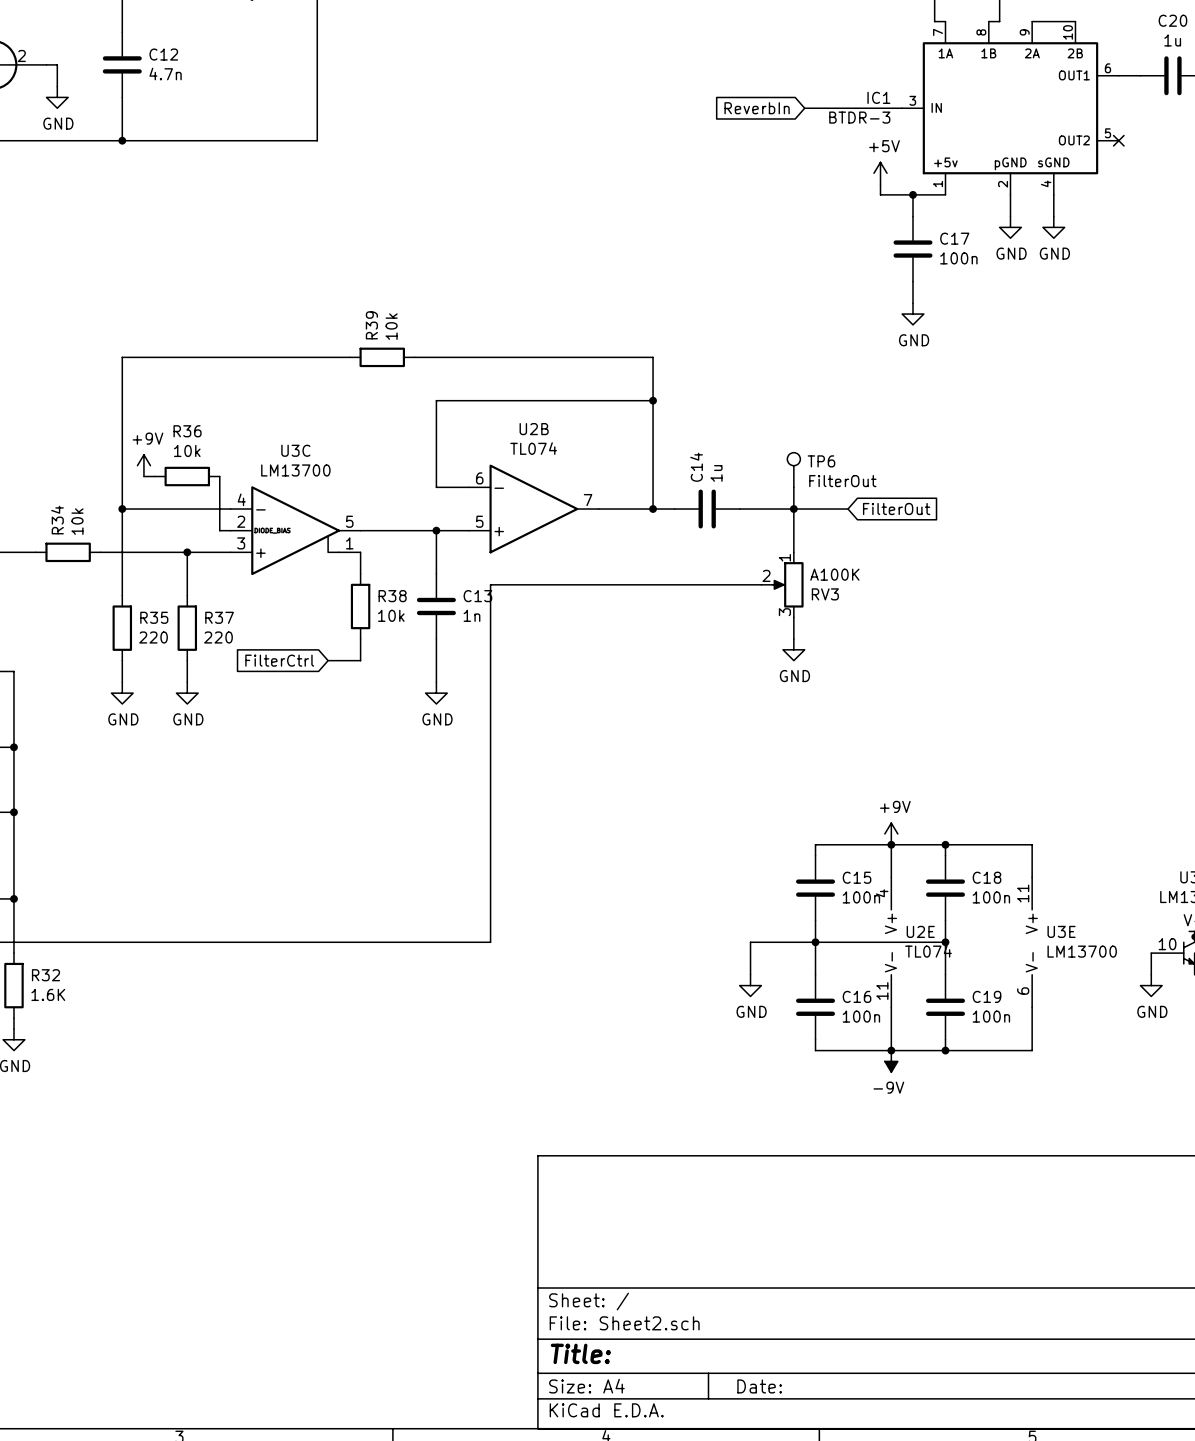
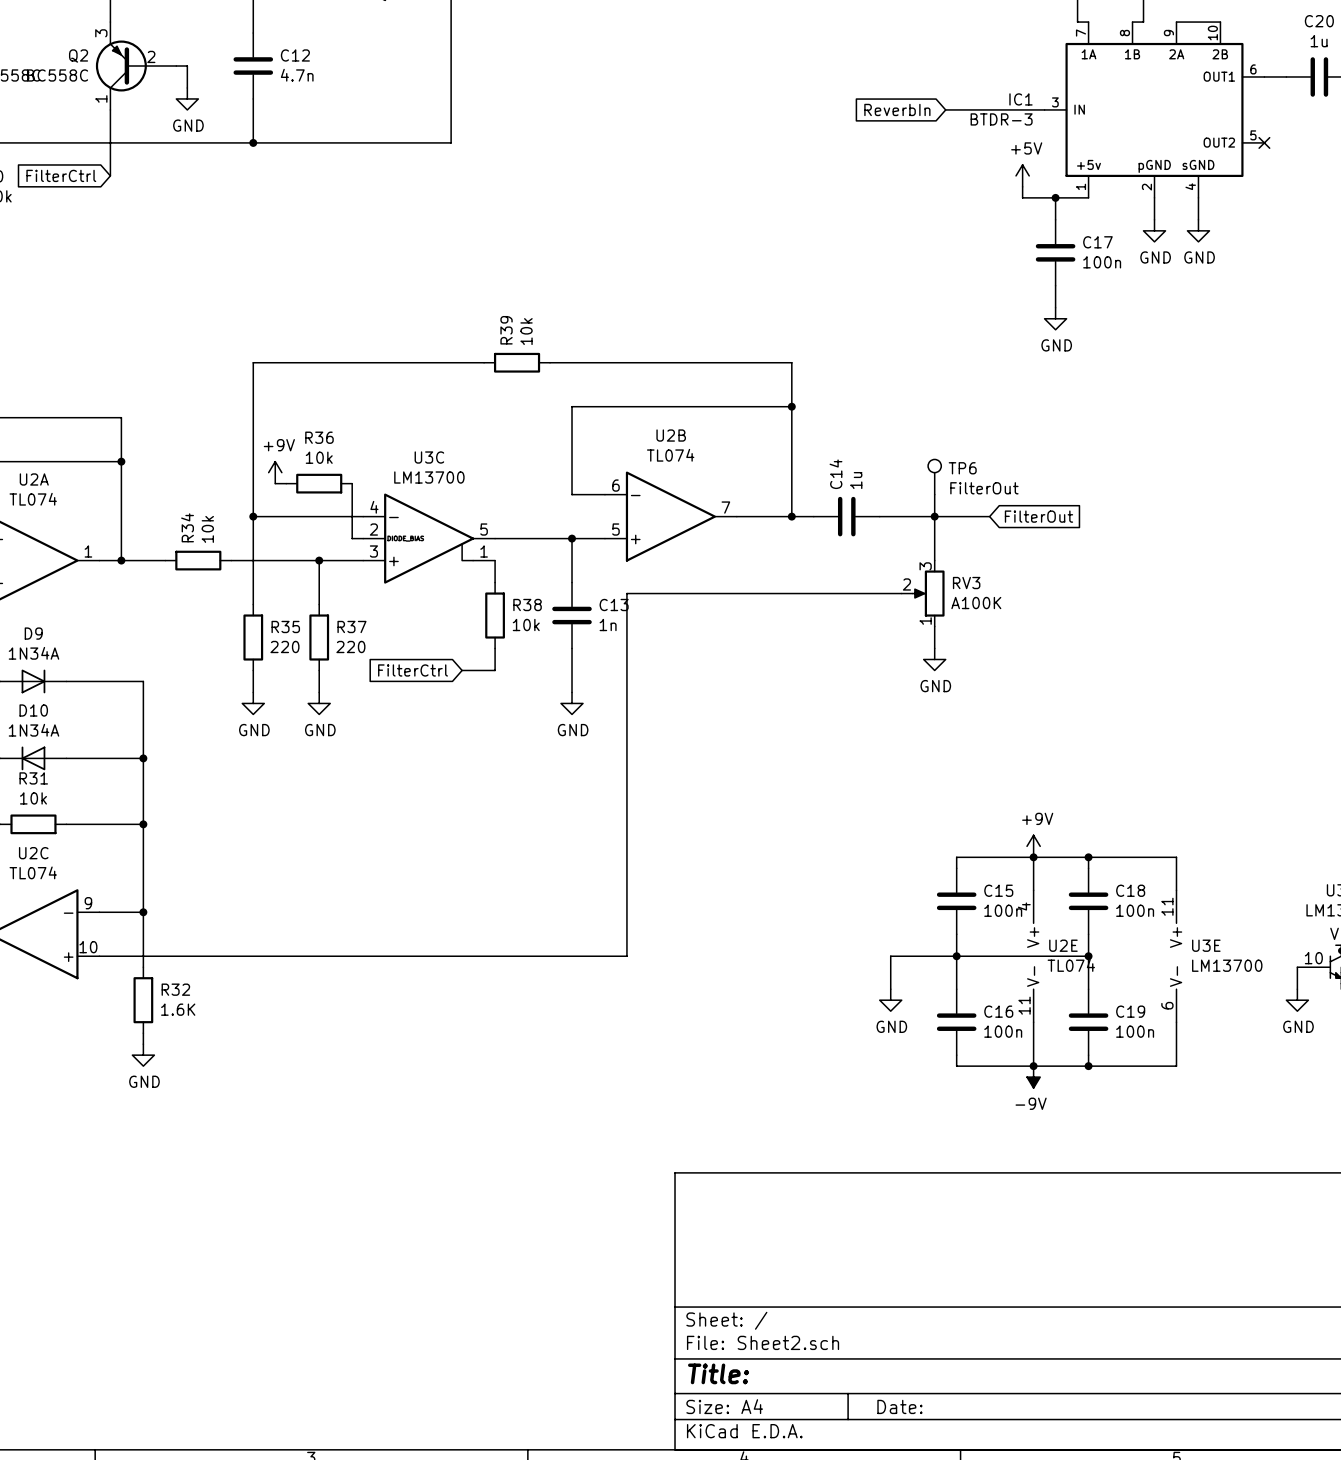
RV3 flip: as is (787, 584) -> up-down (928, 593)

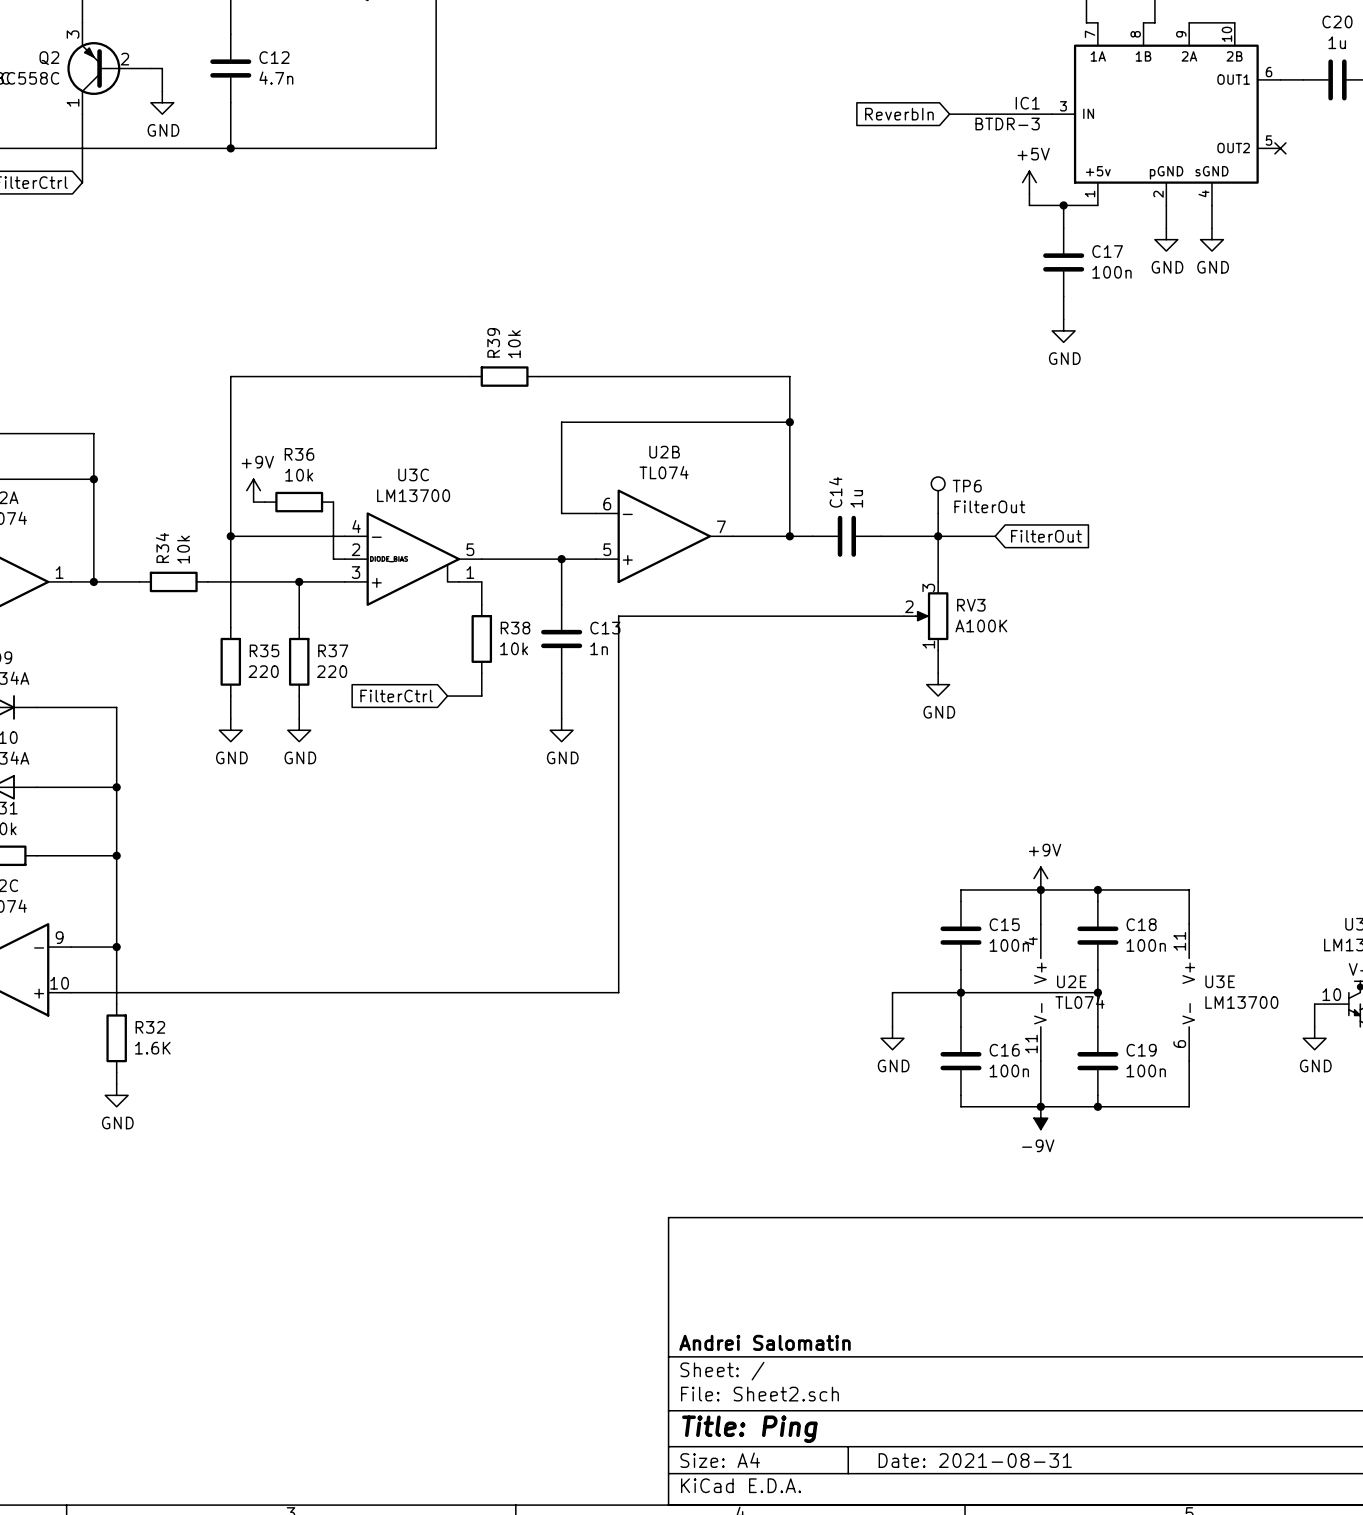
title block: none -> Andrei Salomatin (764, 1342)
title block: Title: (718, 1373) -> Title: Ping (749, 1429)
title block: Date: (899, 1406) -> Date: 2021-08-31 (975, 1460)

